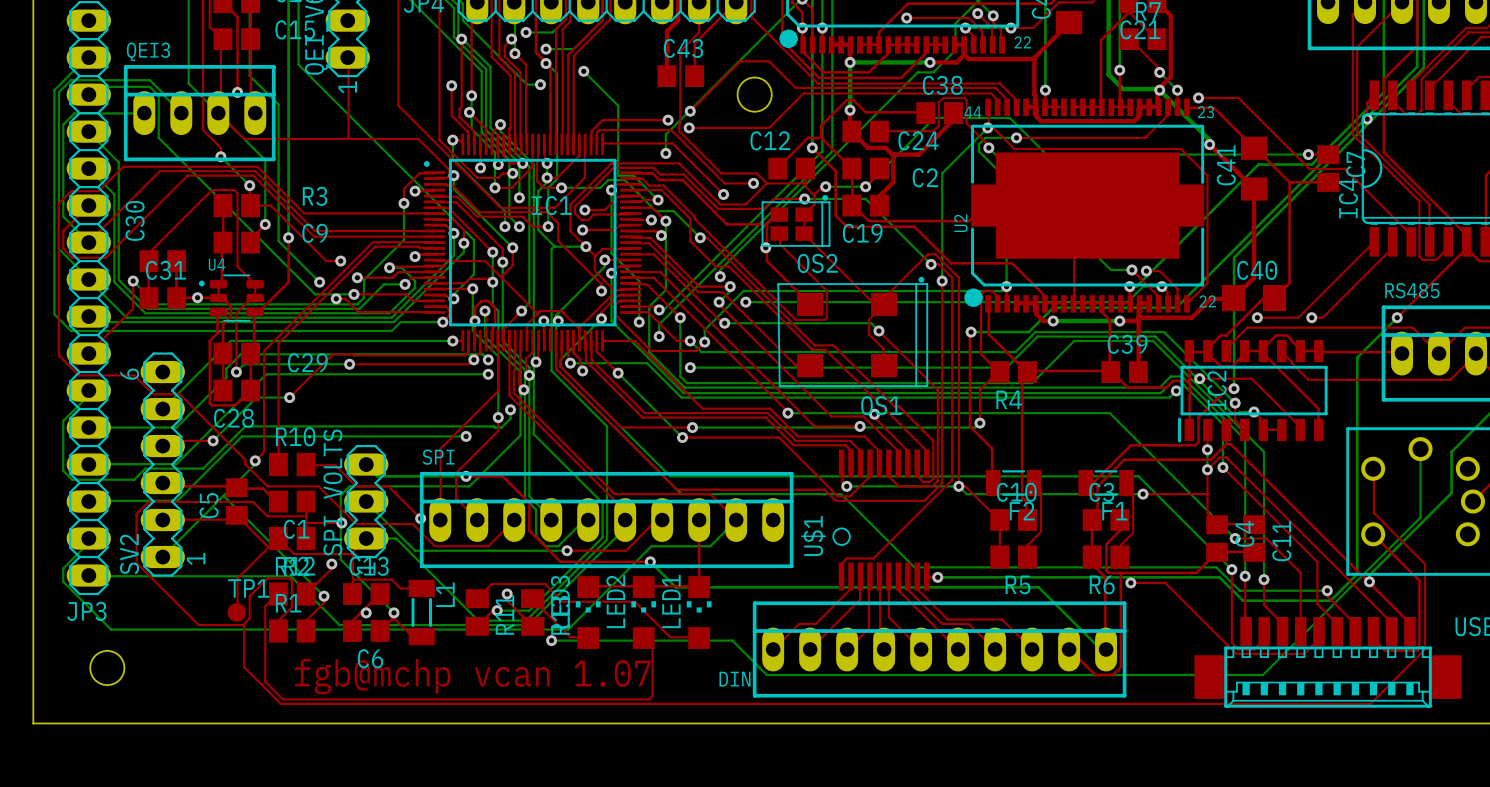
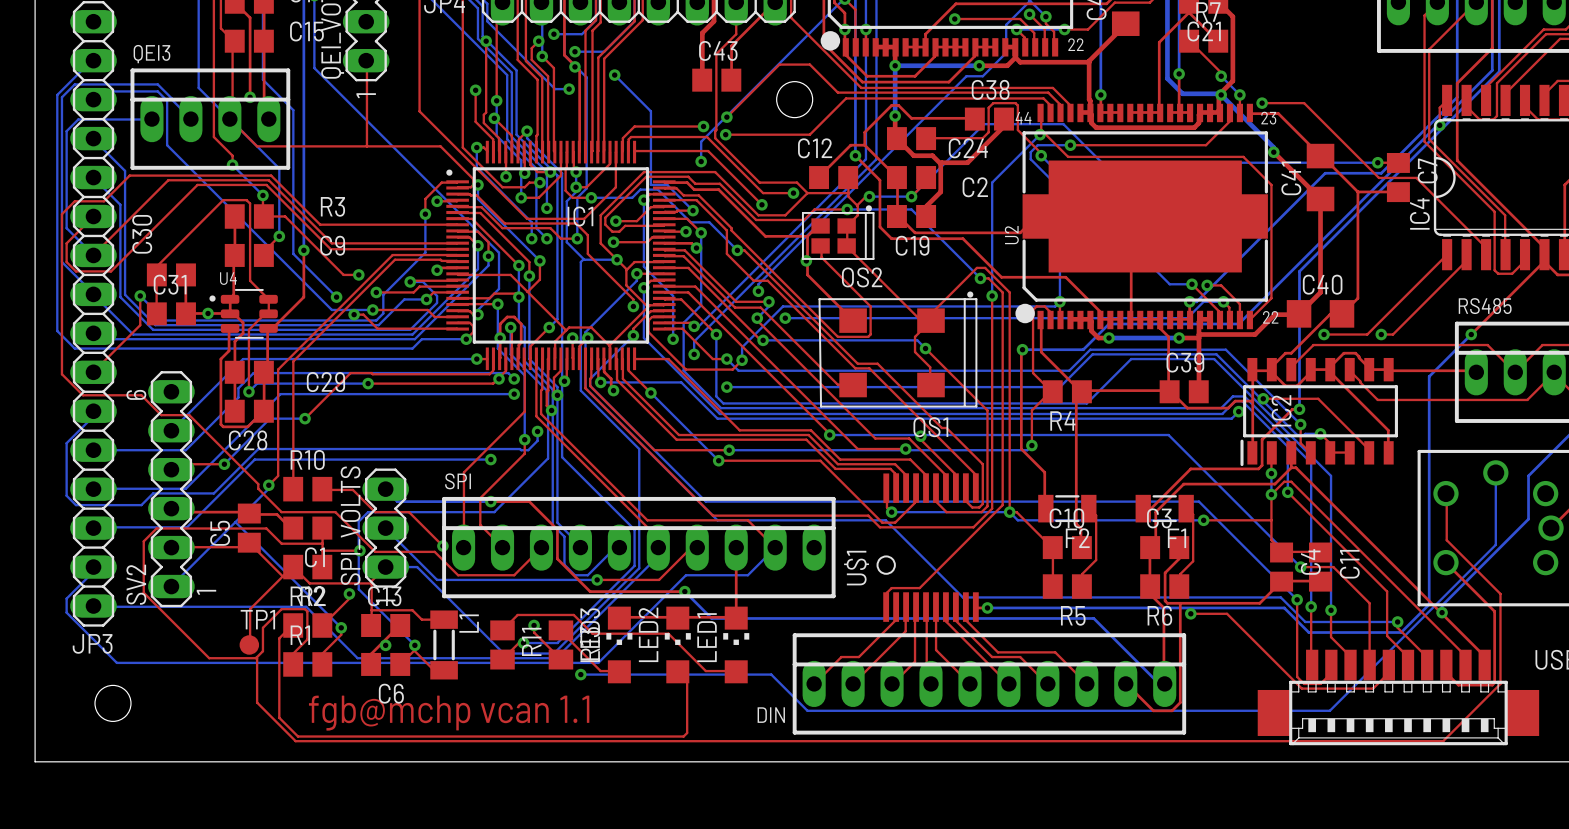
text: fgb@mchp vcan 1.07 (472, 676) -> fgb@mchp vcan 1.1 (449, 713)

